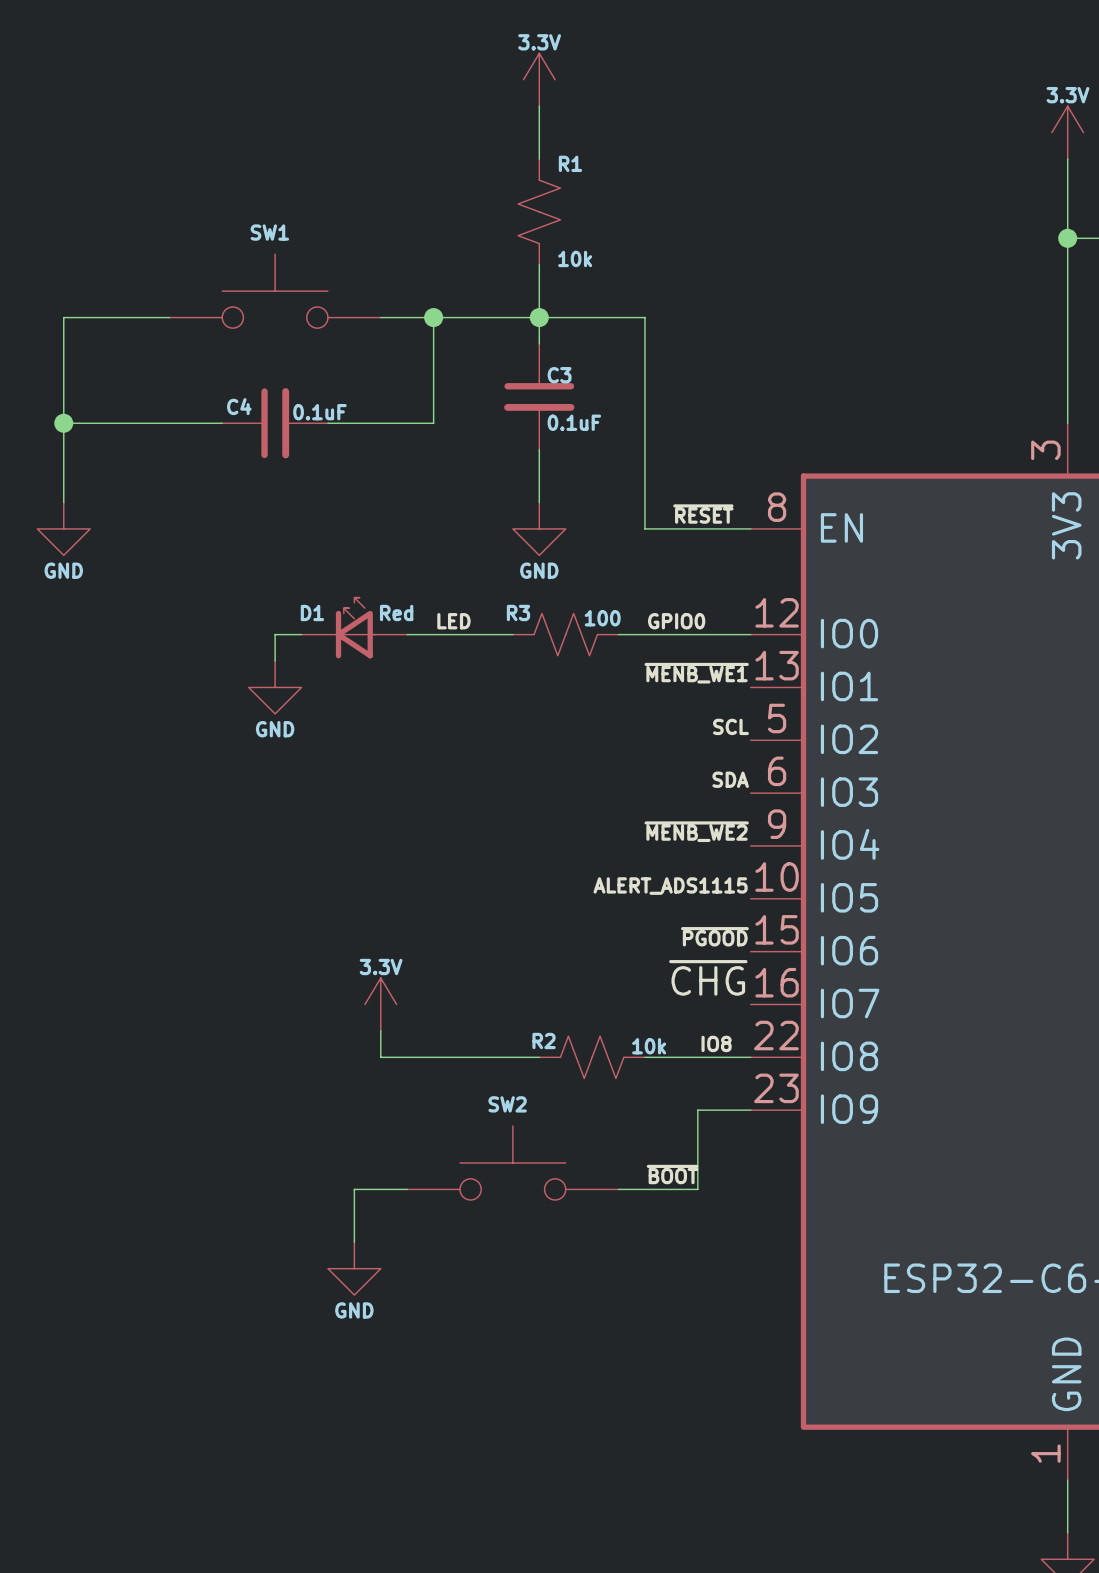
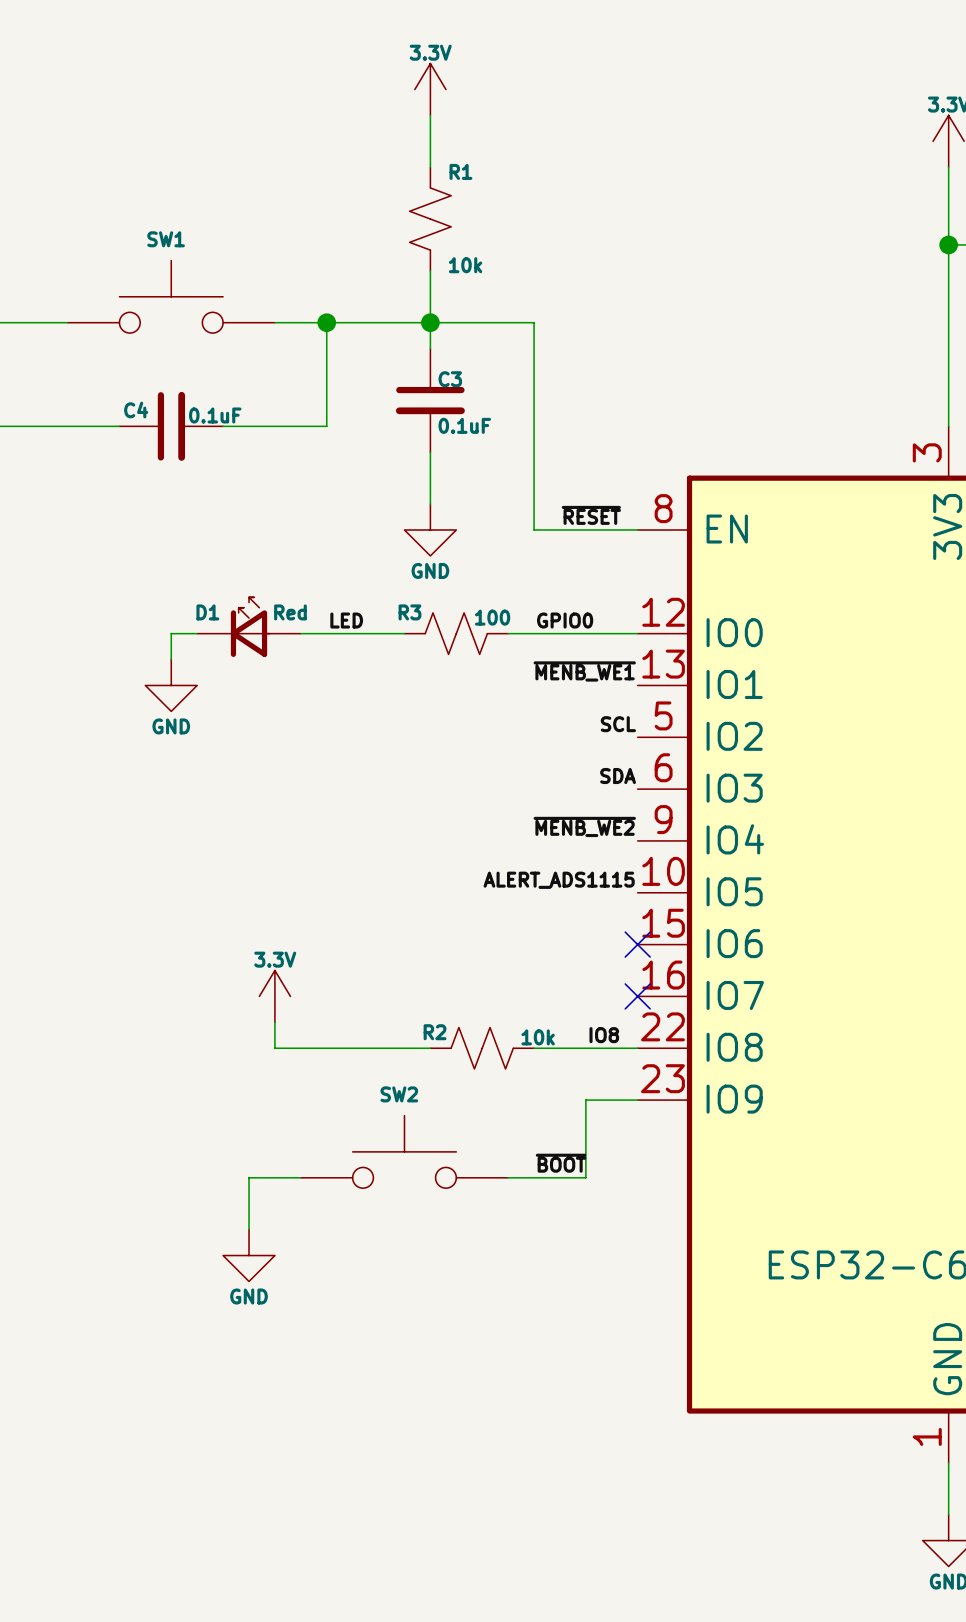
label: ~{PGOOD} (714, 936) -> none
no-connect mark: none -> (637, 944)
label: ~{CHG} (708, 977) -> none
no-connect mark: none -> (637, 996)

